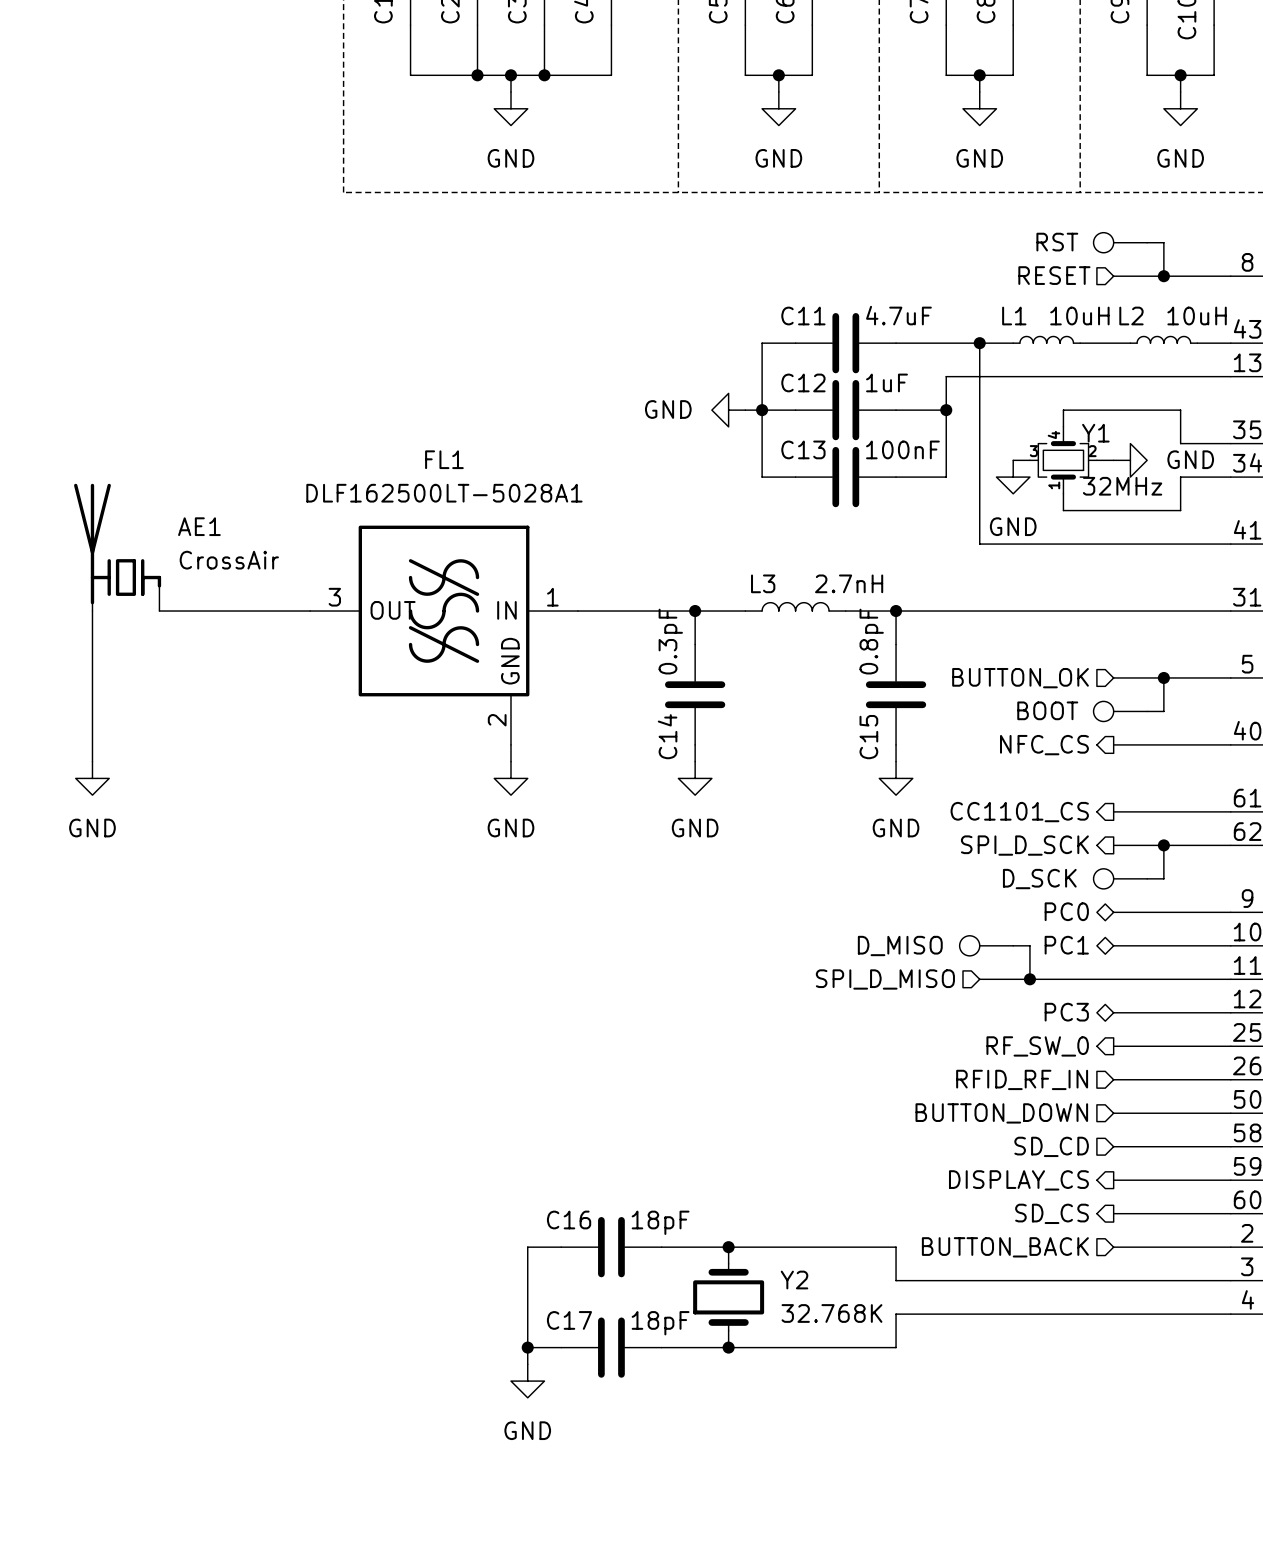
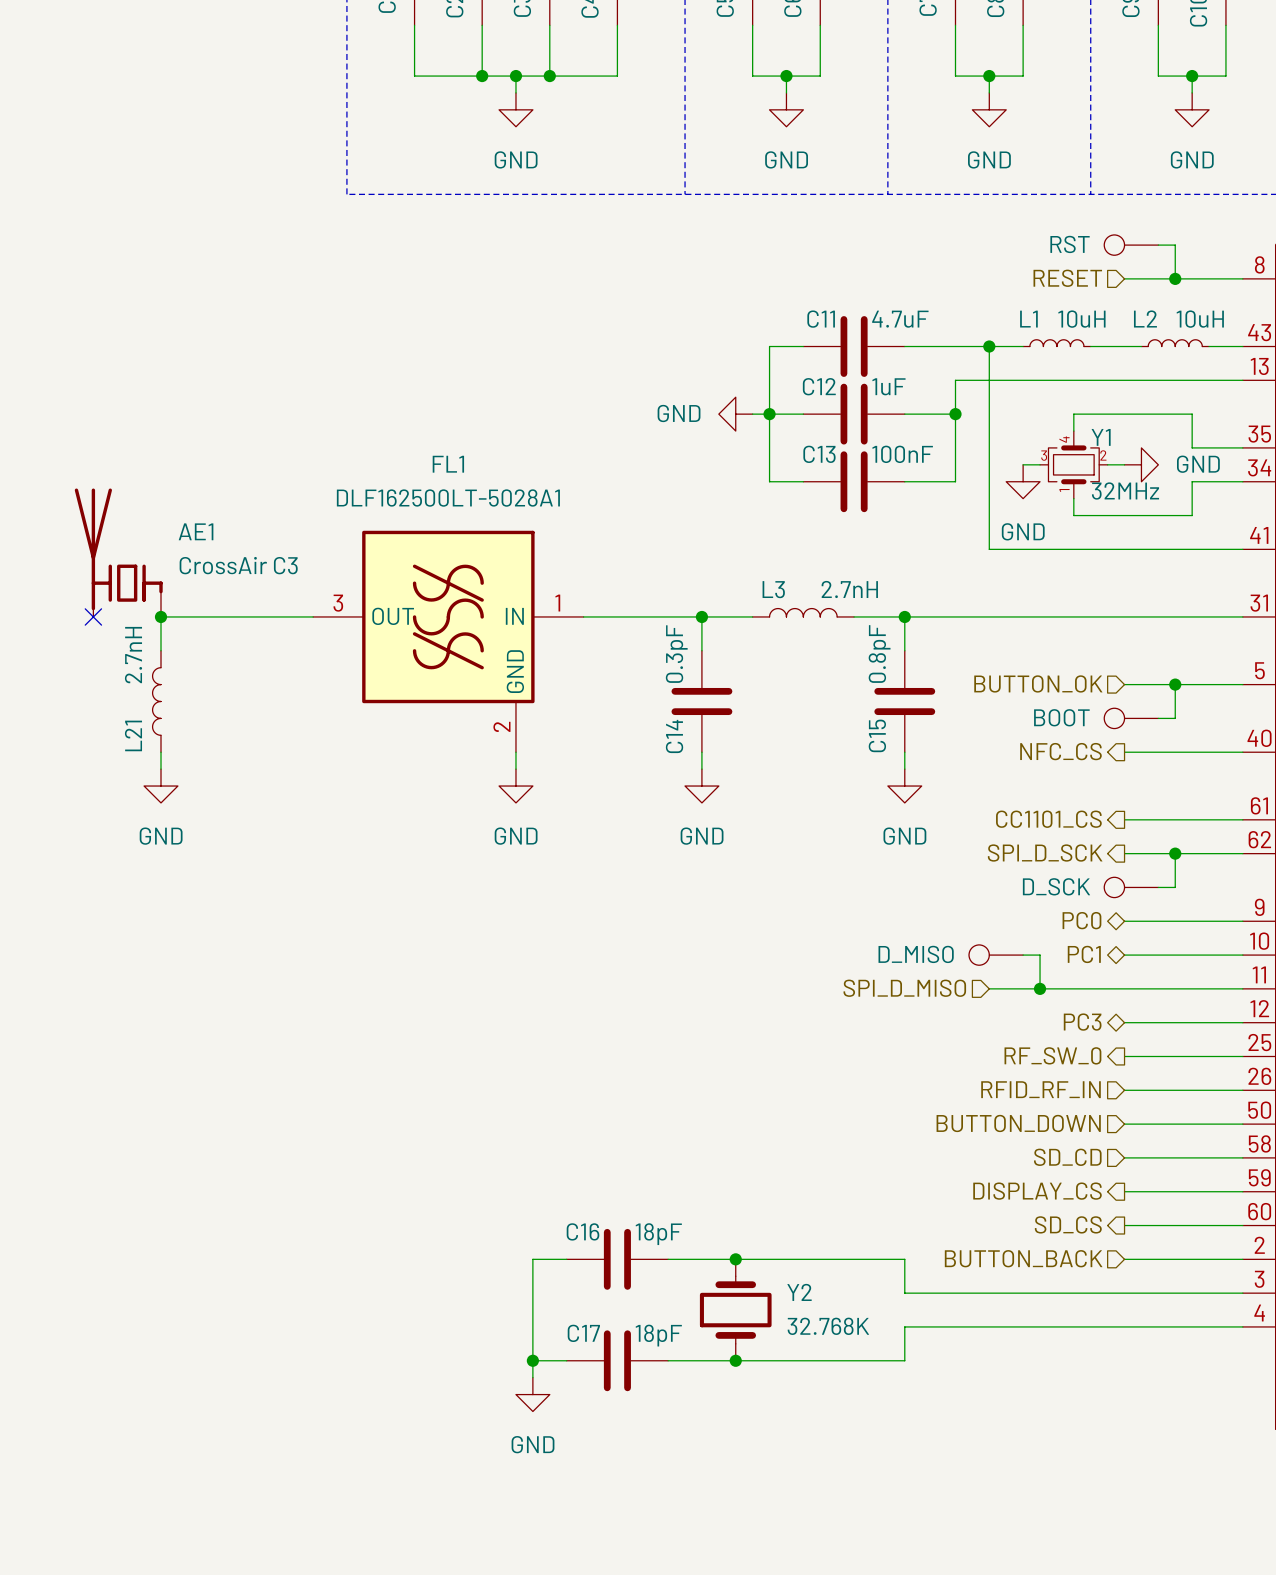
AE1 value: CrossAir (229, 560) -> CrossAir C3 (238, 565)
wire: (92, 611) (92, 761) -> none
no-connect mark: none -> (93, 616)
wire: none -> (160, 616) (160, 650)
junction: none -> (160, 616)
L21: none -> 2.7nH (156, 701)
wire: none -> (160, 752) (160, 769)
power symbol position: GND (92, 778) -> GND (160, 786)

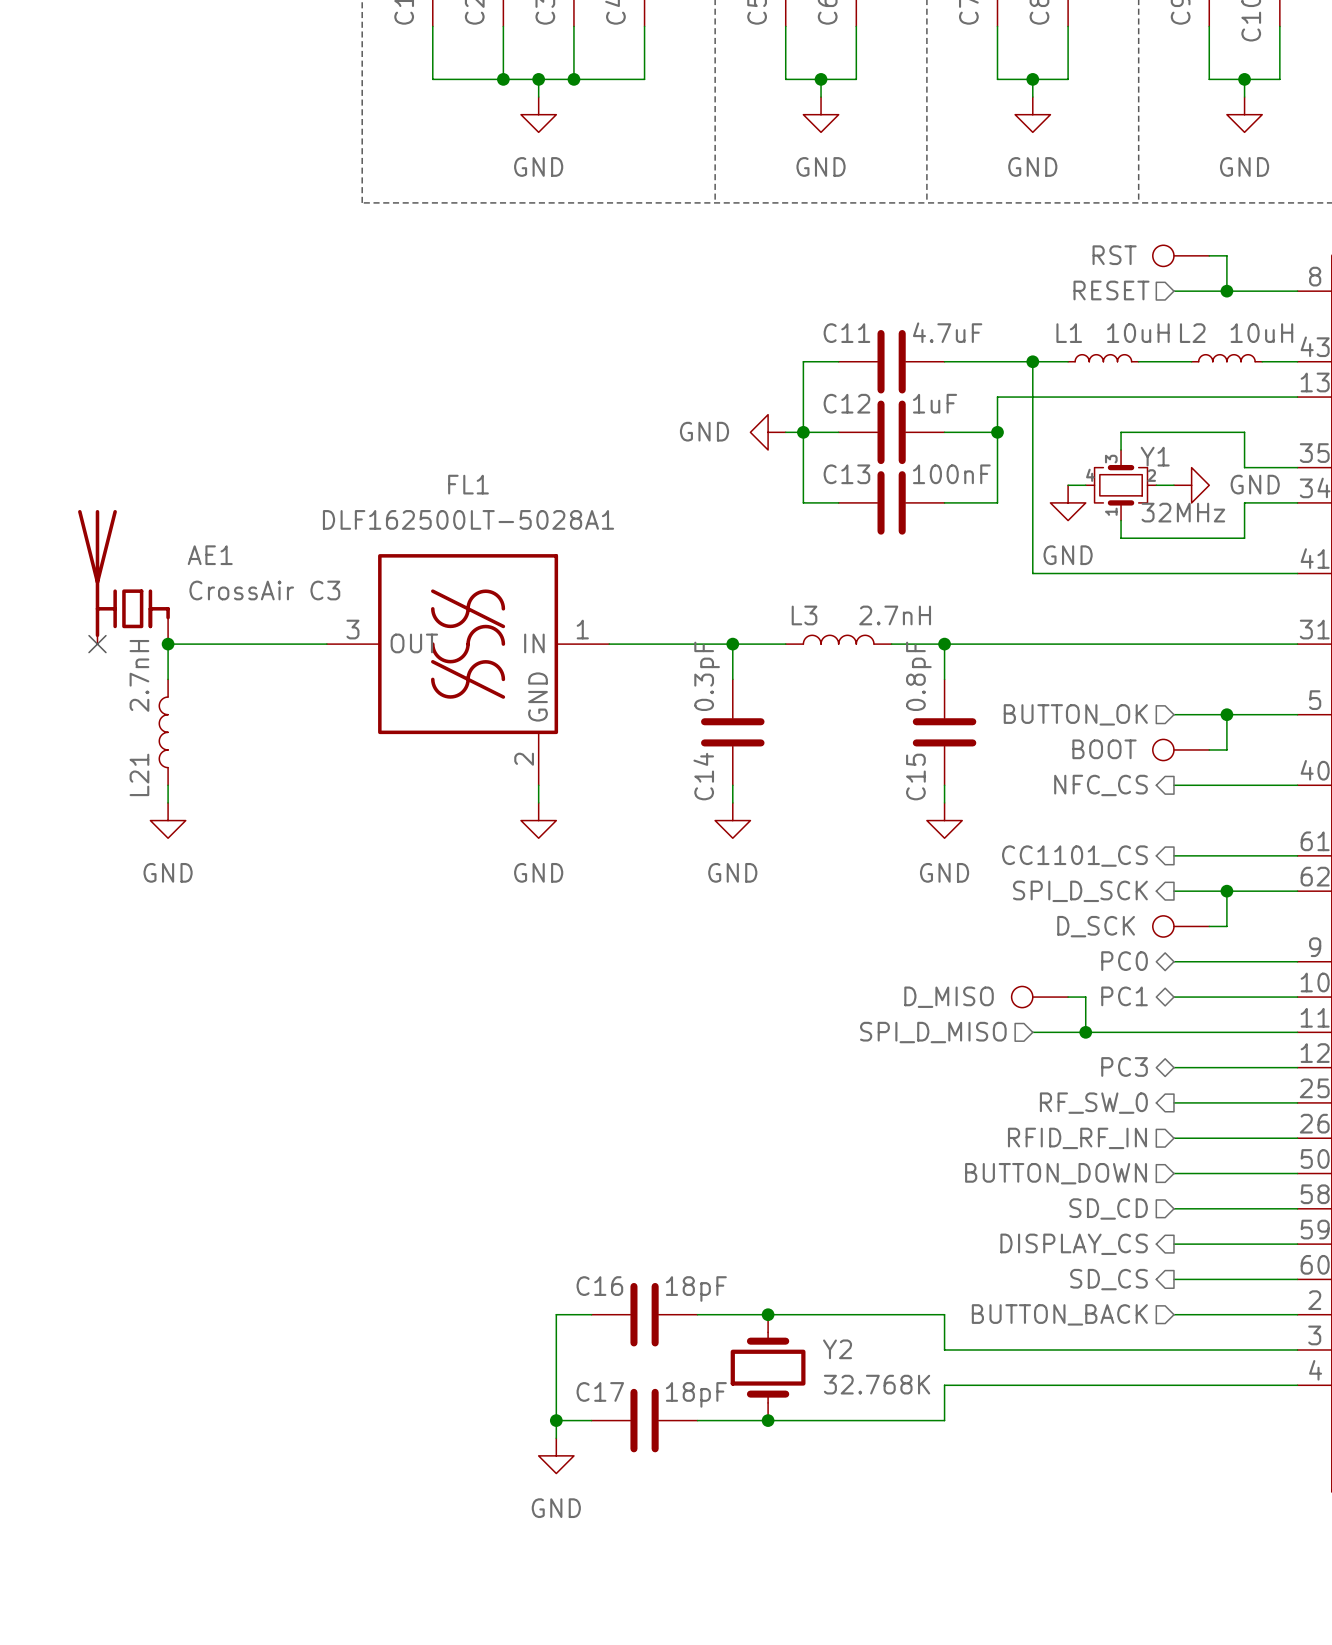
Y1 pin number: 4 (1064, 439) -> 3 (1111, 459)
Y1 pin number: 3 (1044, 455) -> 4 (1090, 475)

